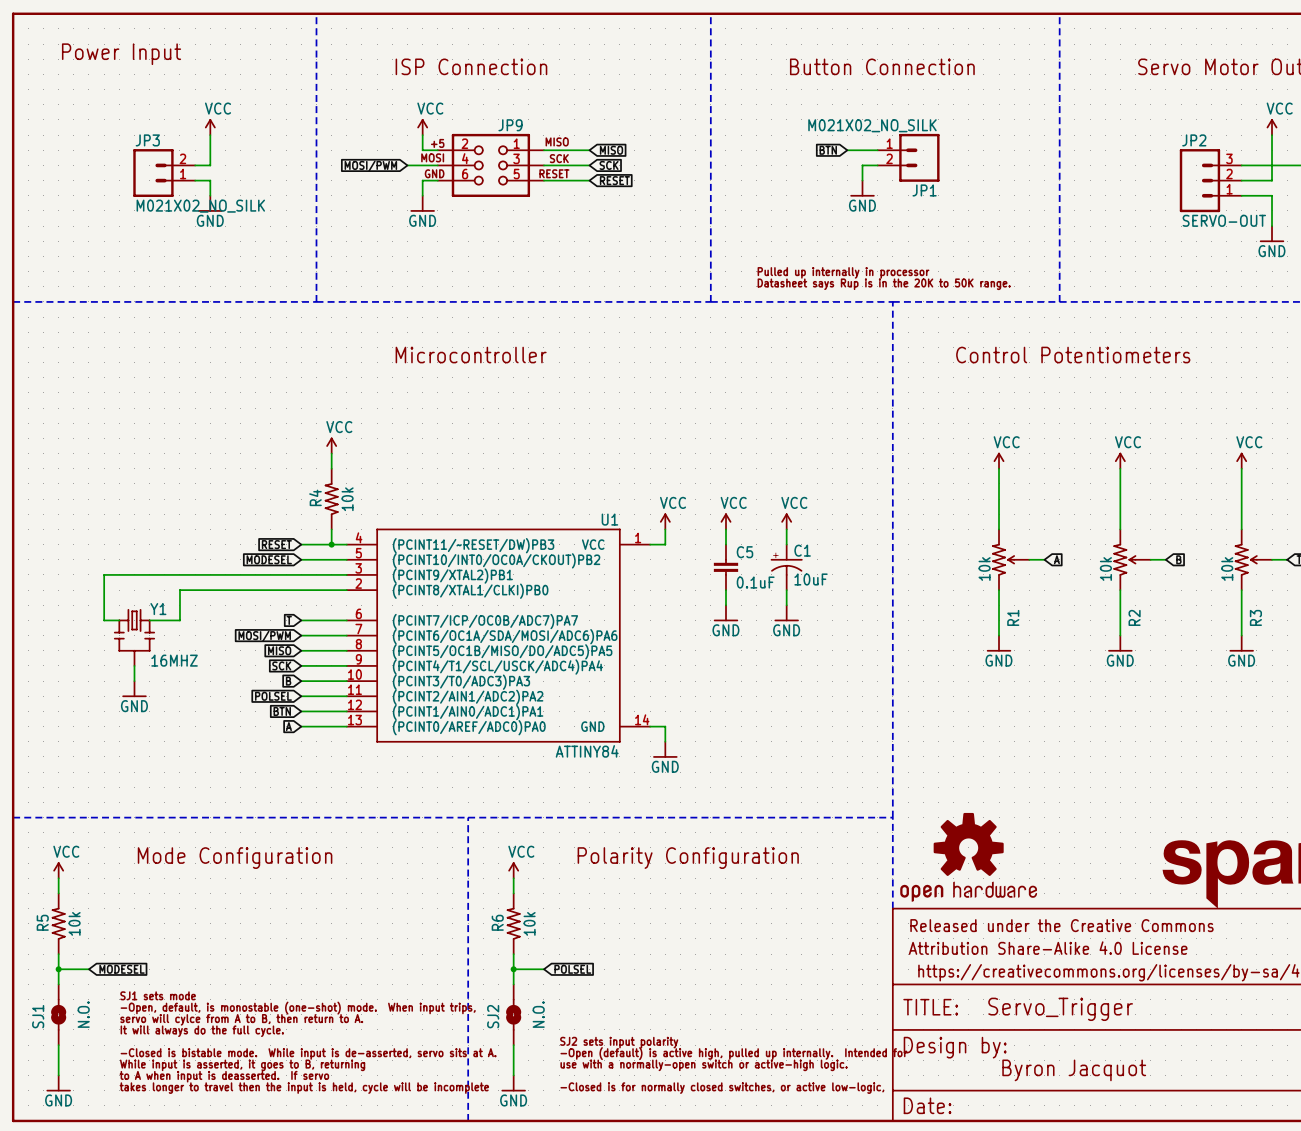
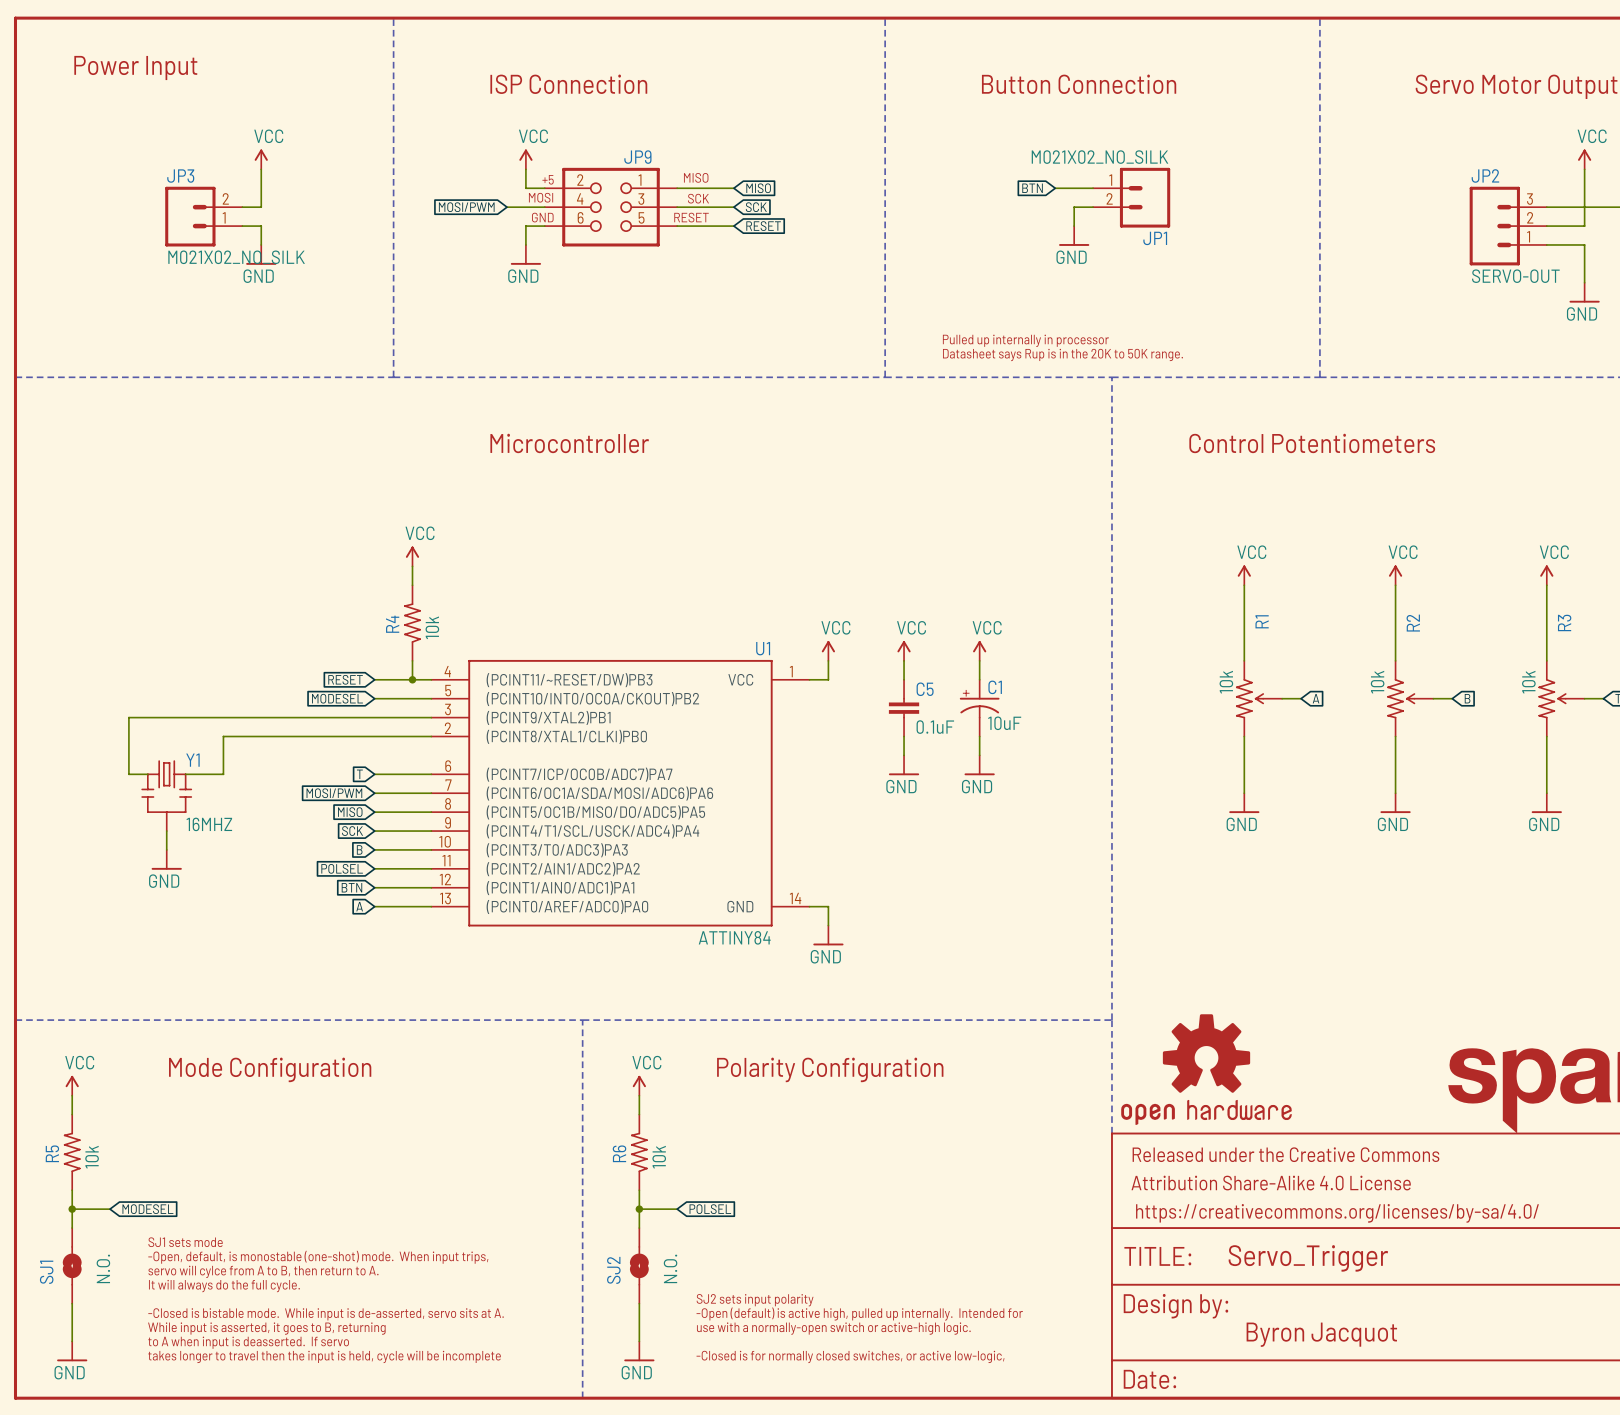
R1 flip: as is (1003, 559) -> up-down (1249, 698)
R2 flip: as is (1124, 559) -> up-down (1401, 698)
R3 flip: as is (1246, 559) -> up-down (1552, 698)

